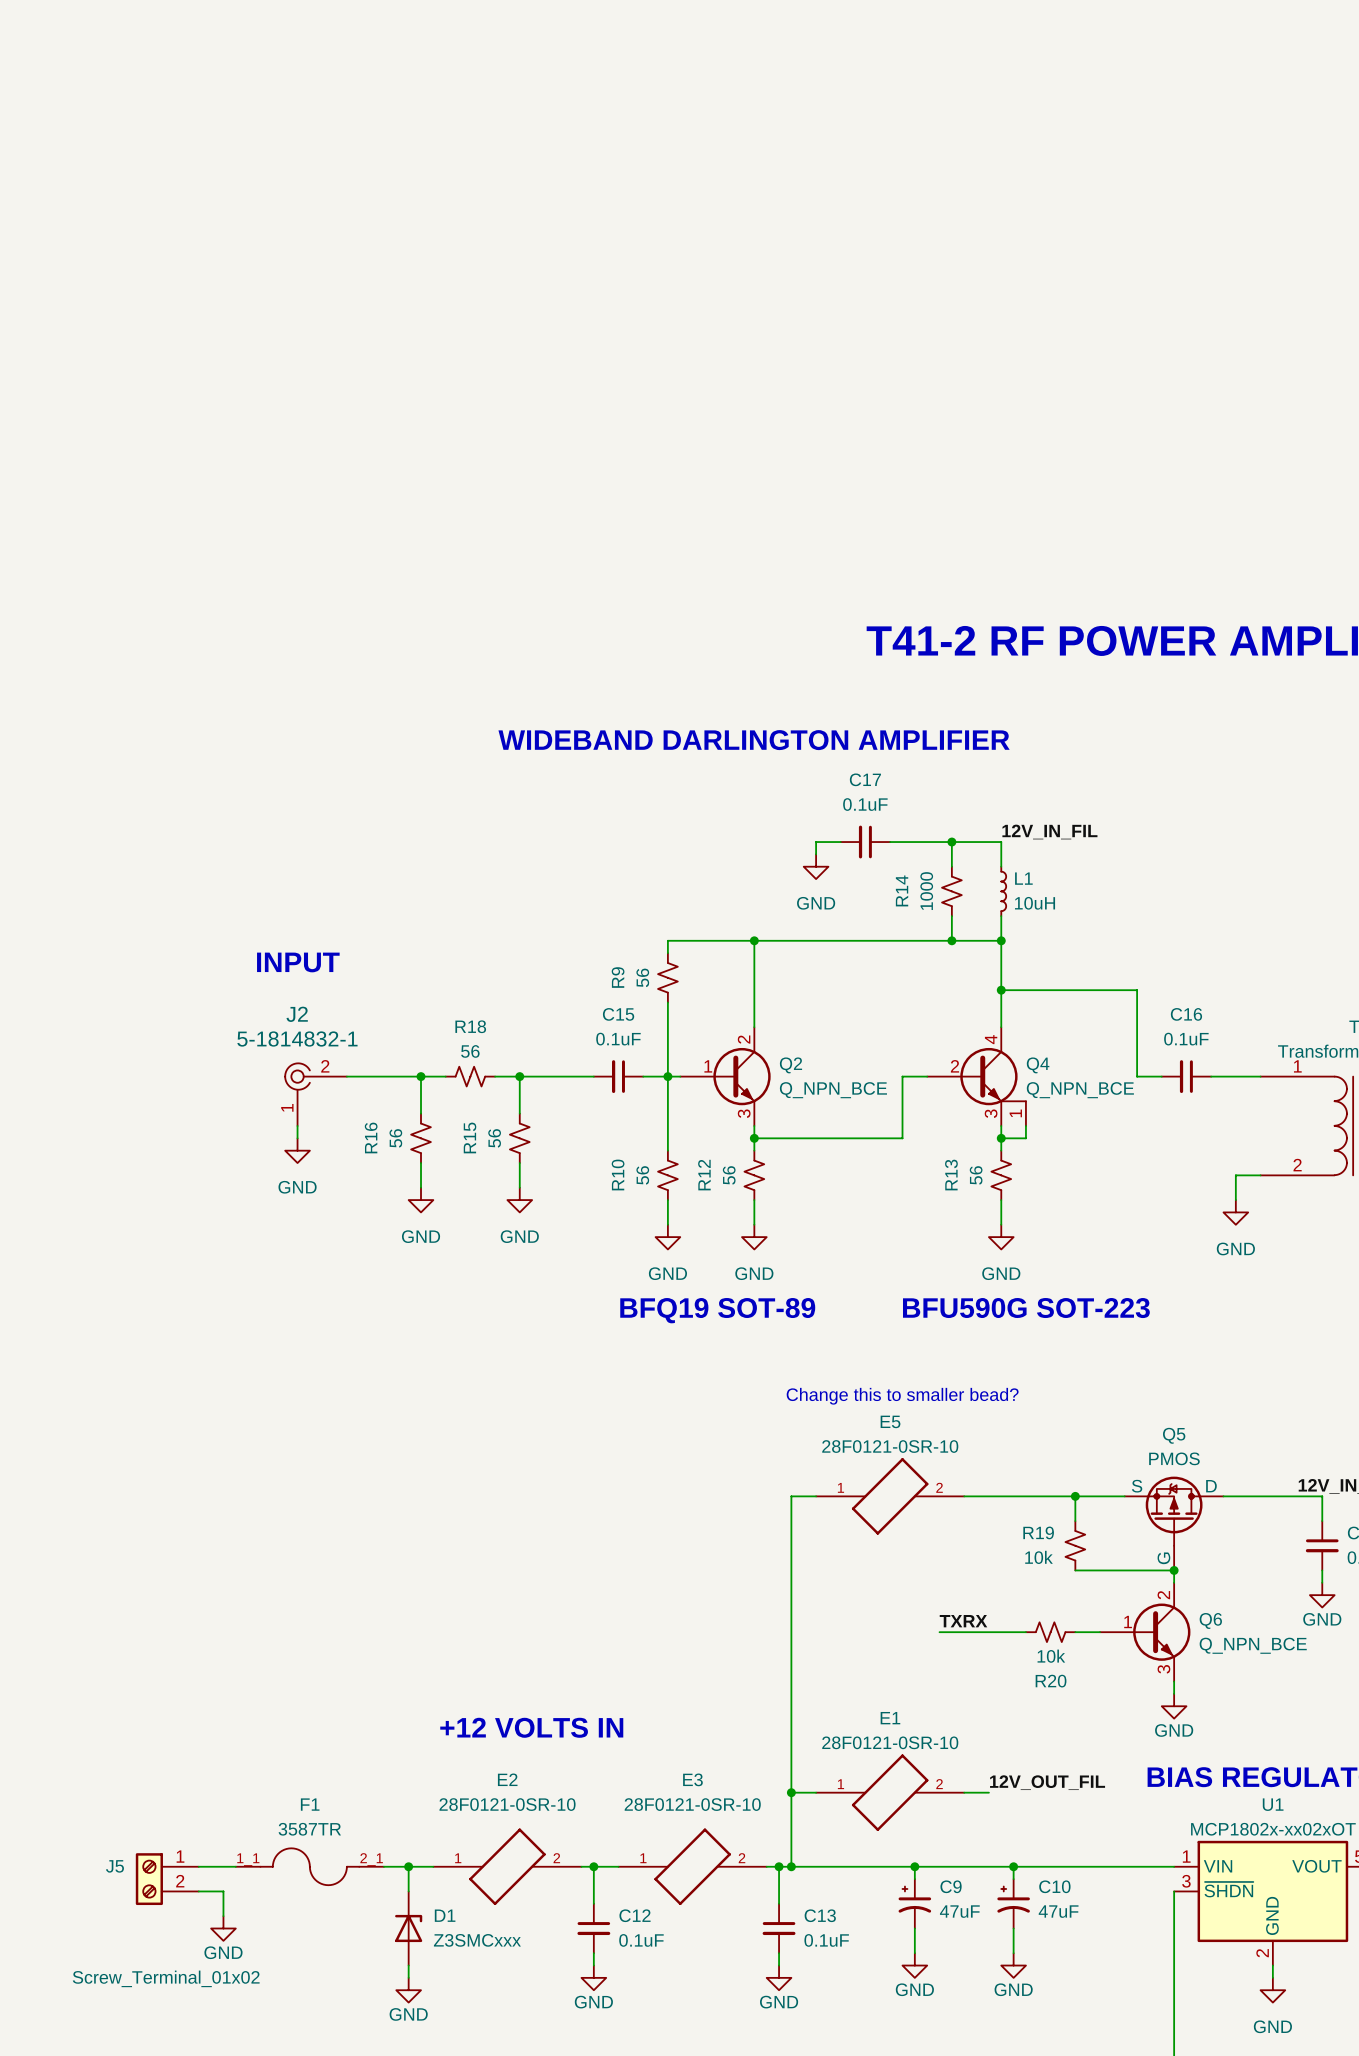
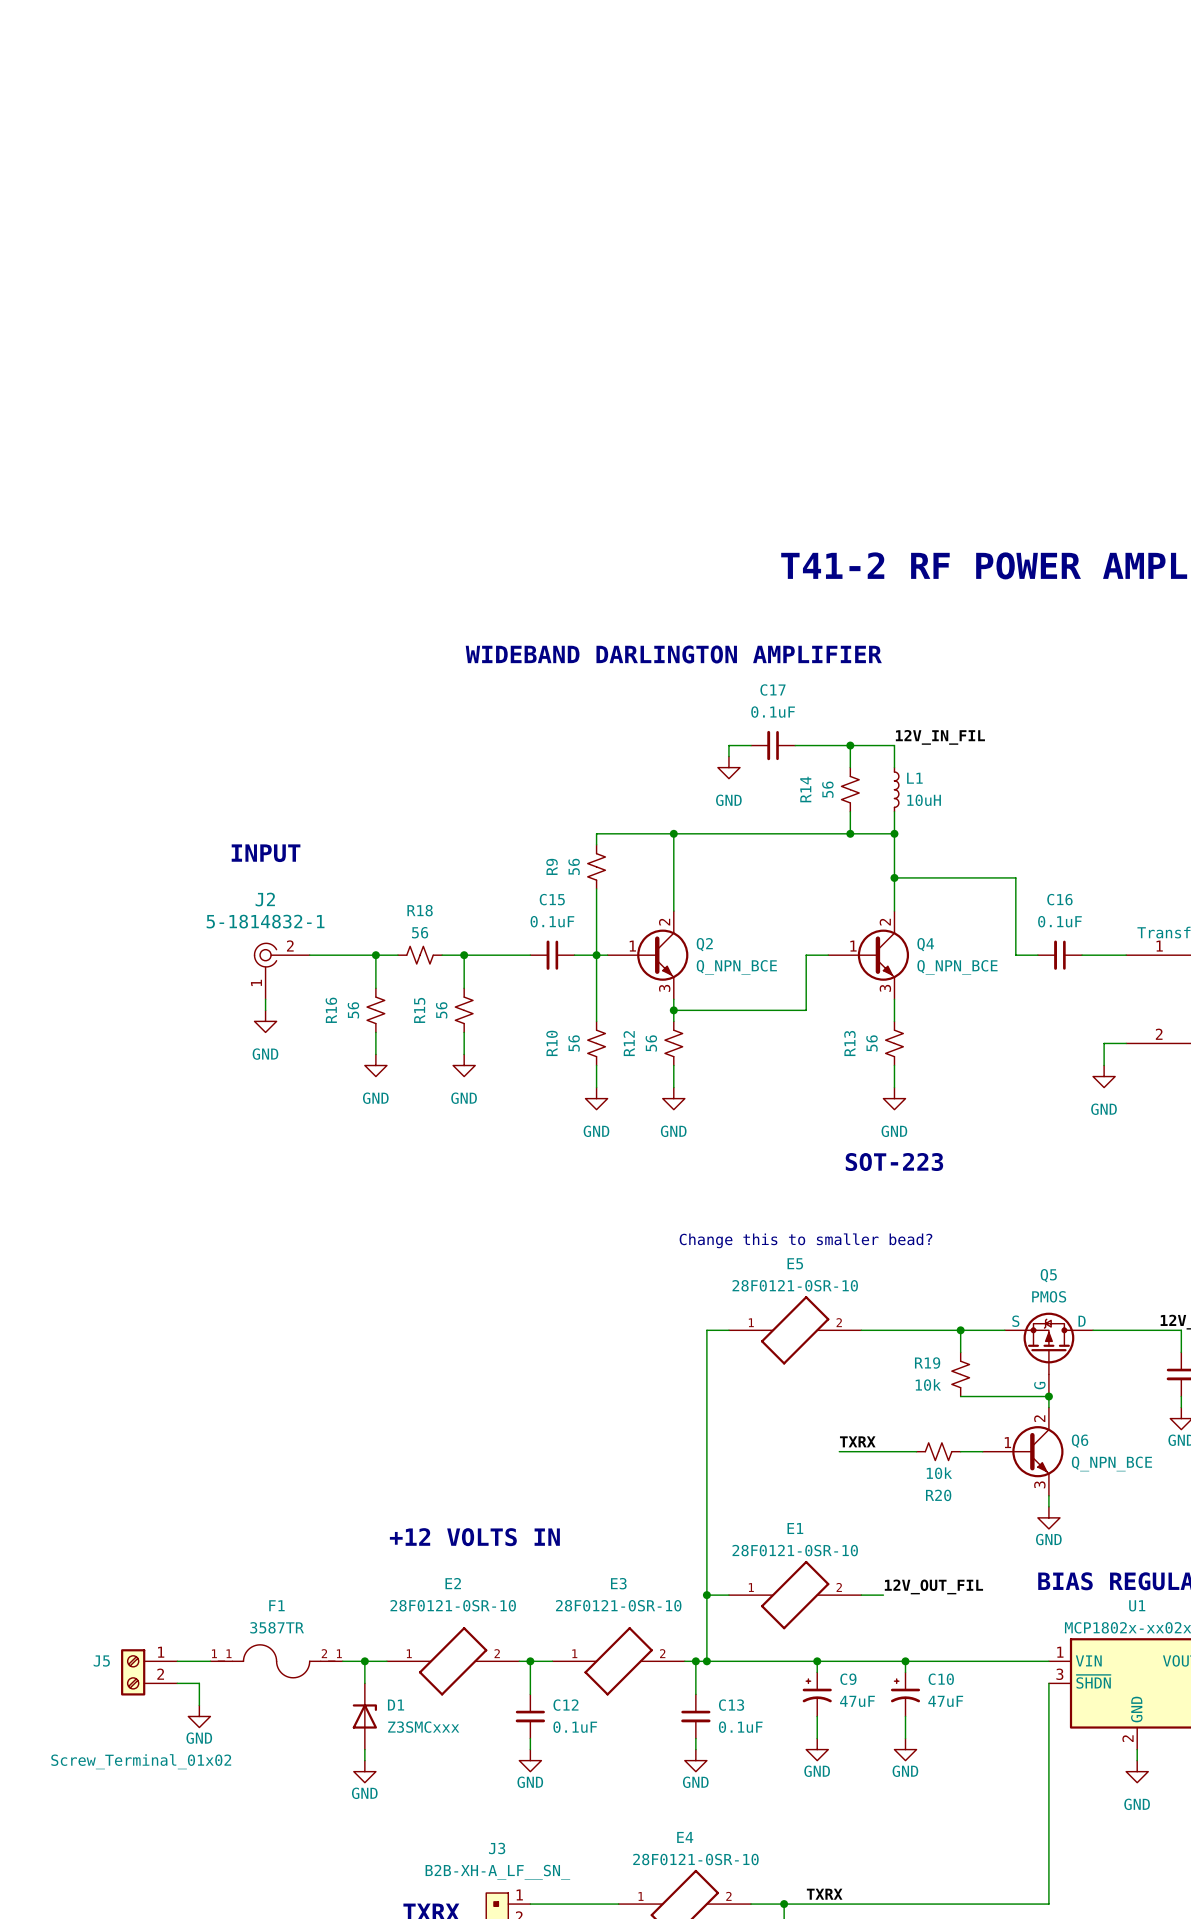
R14 value: 1000 (926, 891) -> 56 (827, 789)
Q4 symbol: [927, 1027, 1026, 1126] -> [828, 911, 910, 1000]
wire: (1025, 1125) (1025, 1138) (1001, 1138) -> none
junction: (1001, 1138) -> none
text: BFU590G SOT-223 (1026, 1308) -> SOT-223 (894, 1162)
text: BFQ19 SOT-89 (717, 1310) -> none

